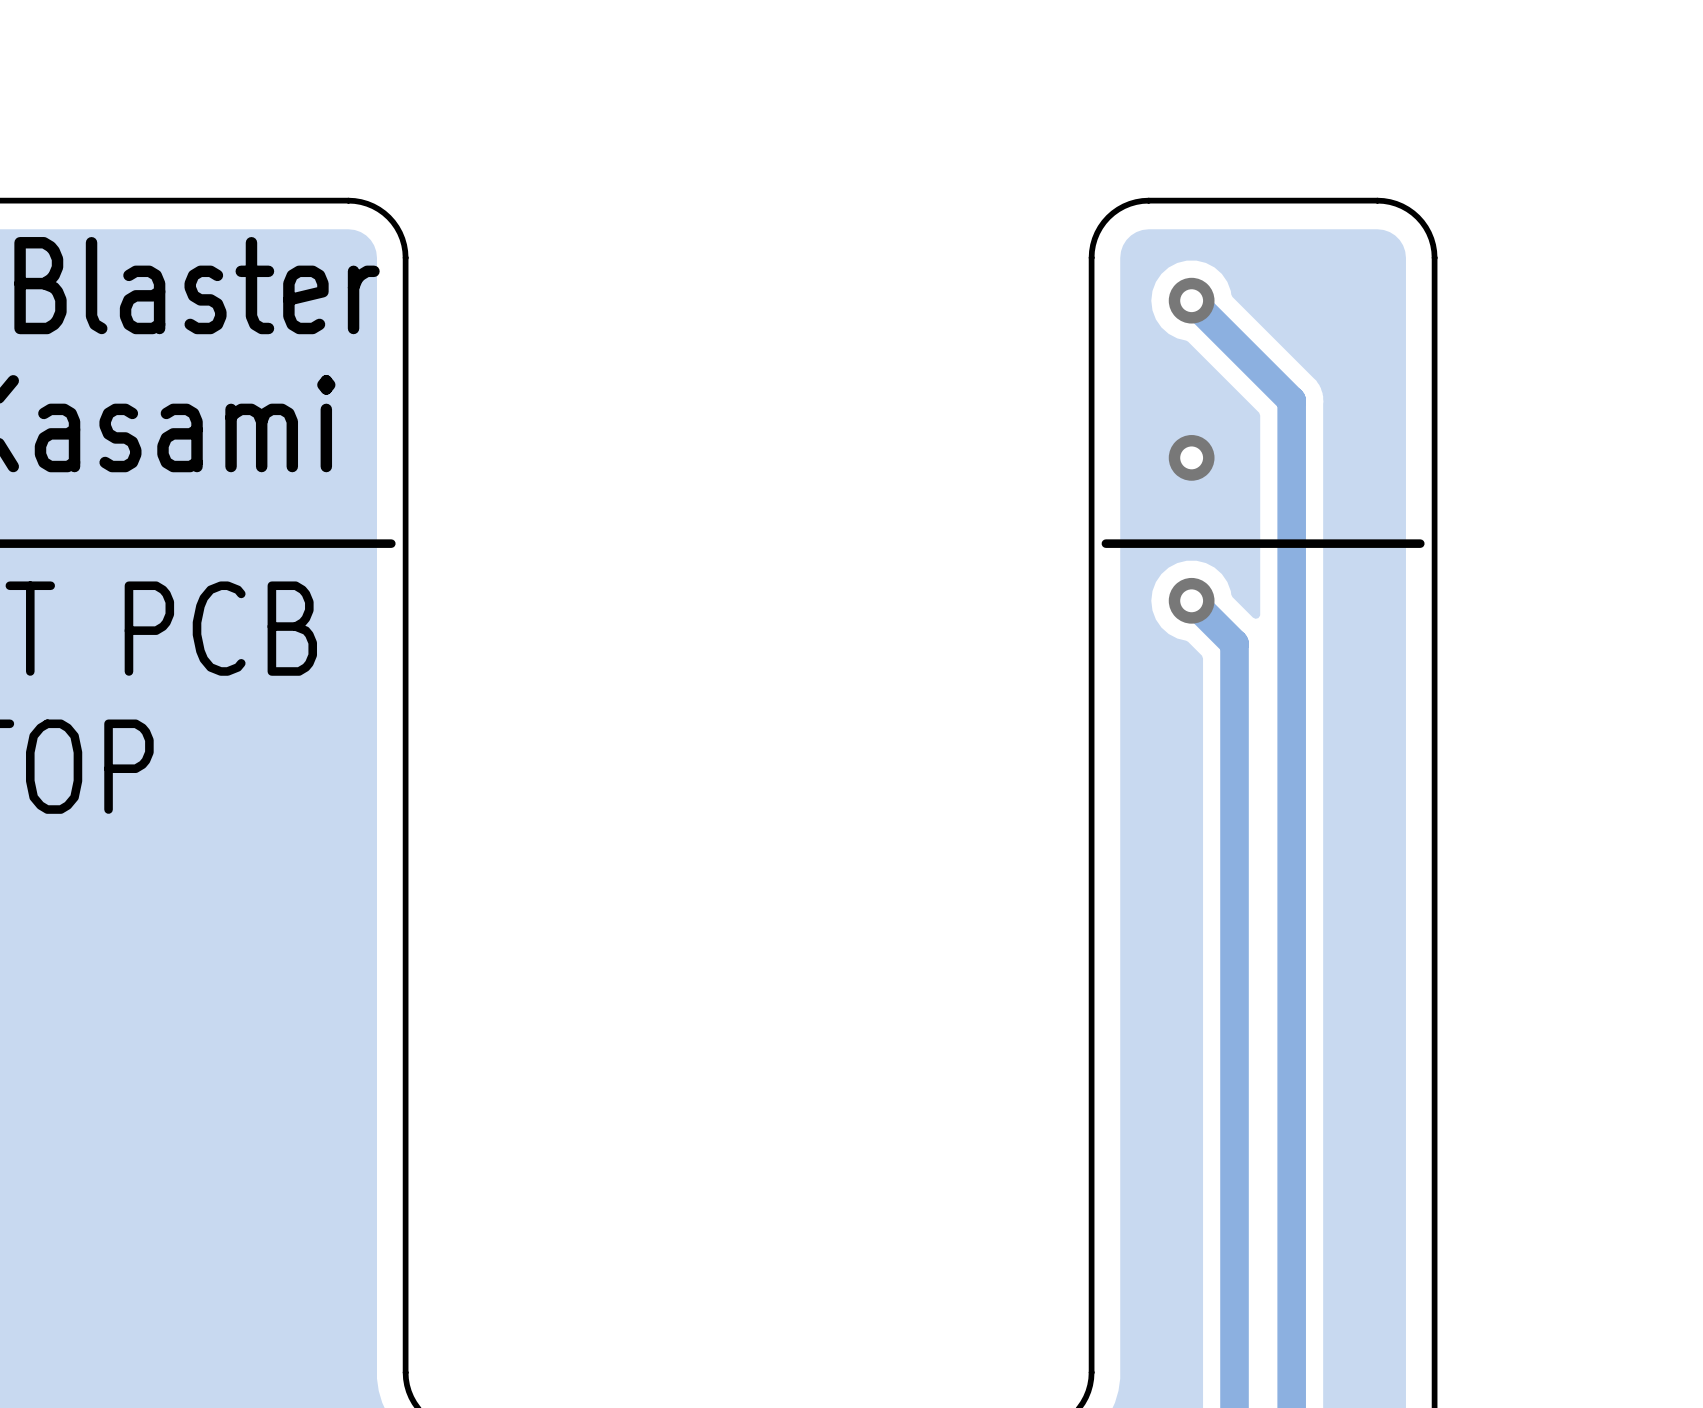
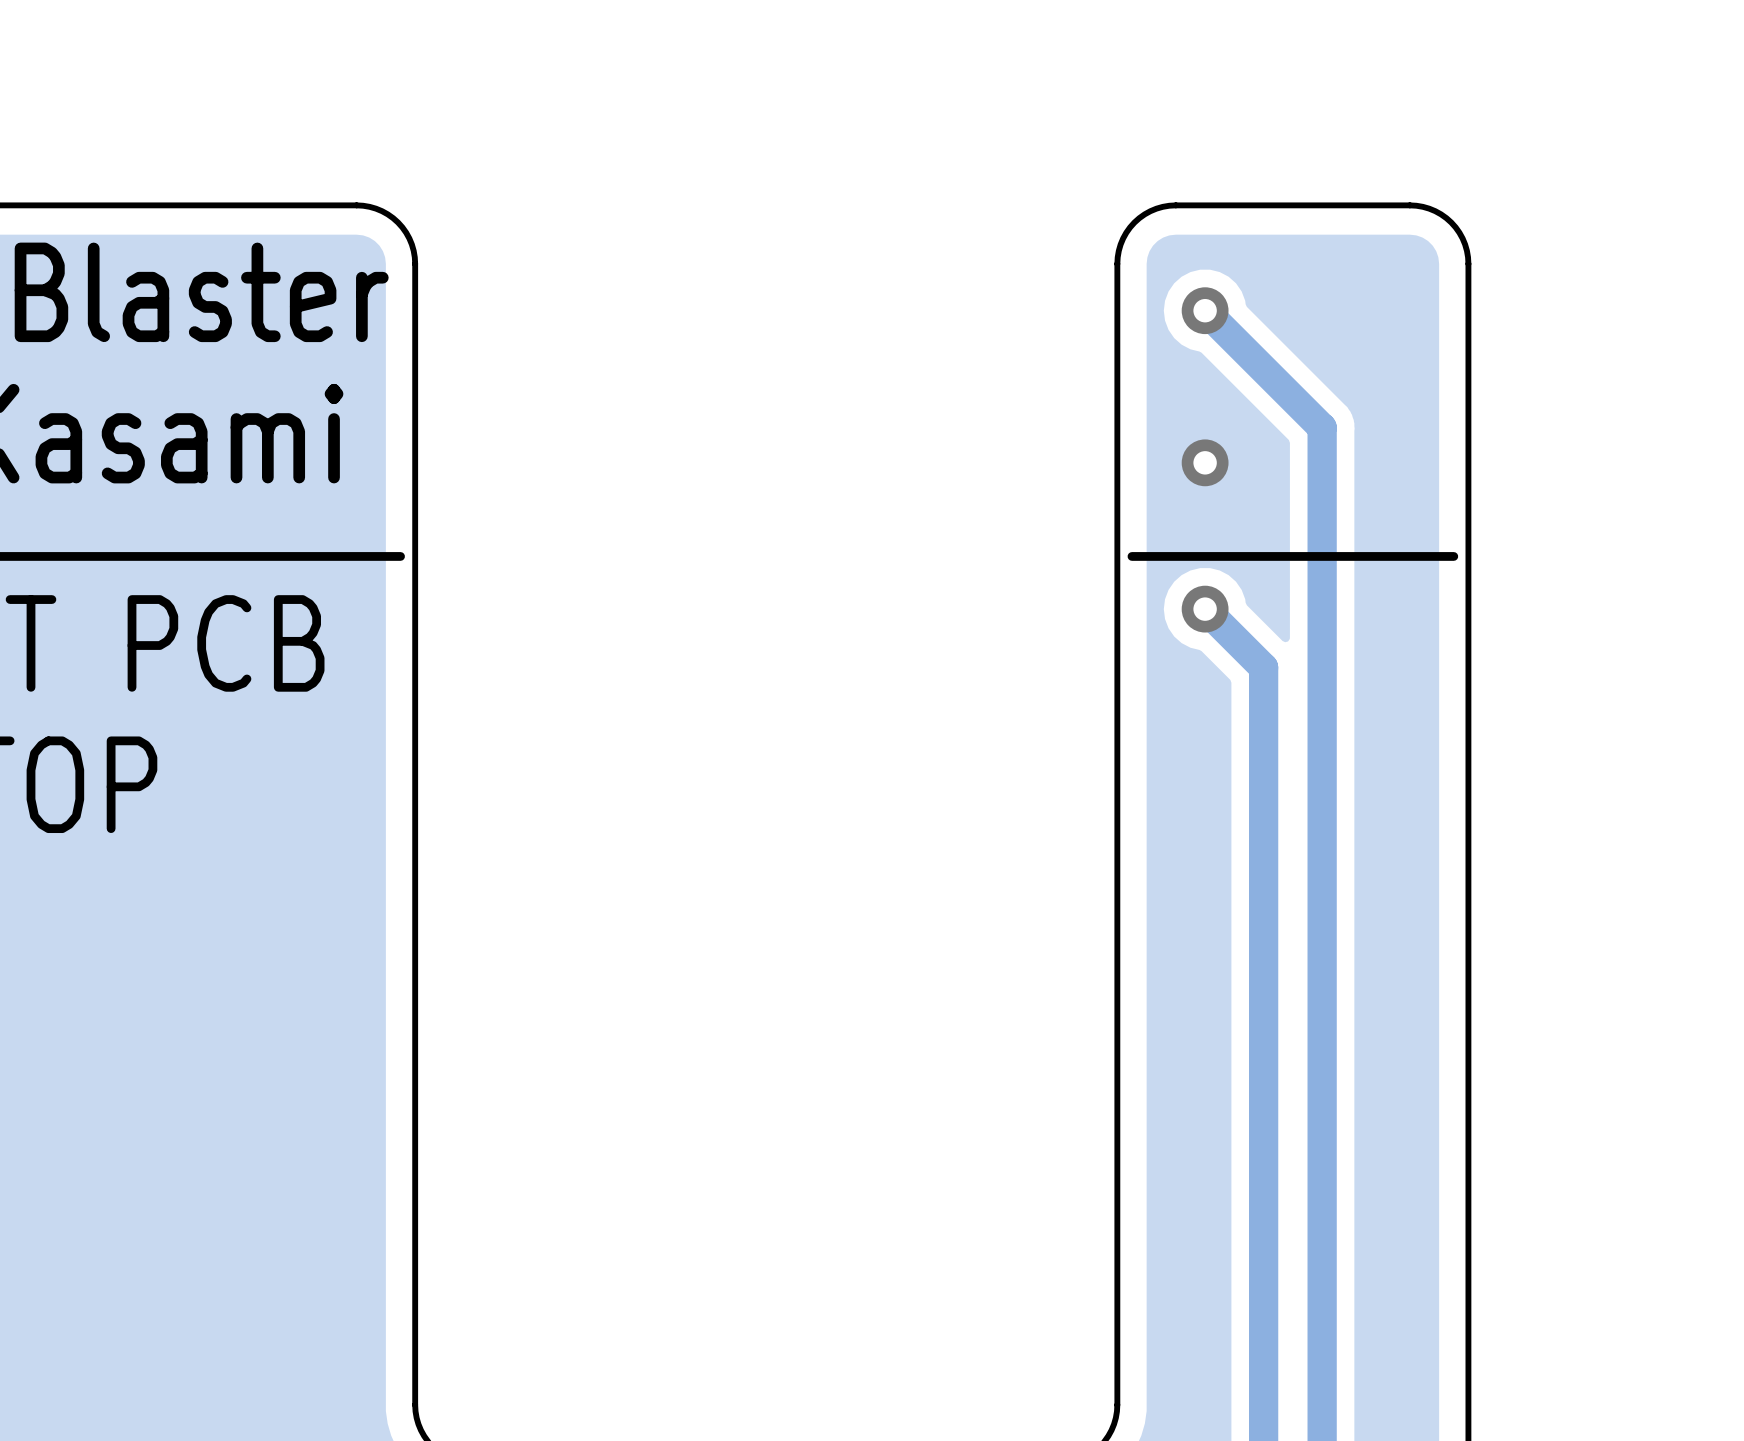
track: (1191, 300) (1291, 400) (1291, 417) -> (1205, 310) (1322, 427)
via position: (1191, 300) -> (1205, 310)
via position: (1191, 457) -> (1205, 462)
track: (1191, 600) (1234, 643) (1234, 652) -> (1205, 609) (1263, 667)
via position: (1191, 600) -> (1205, 609)

